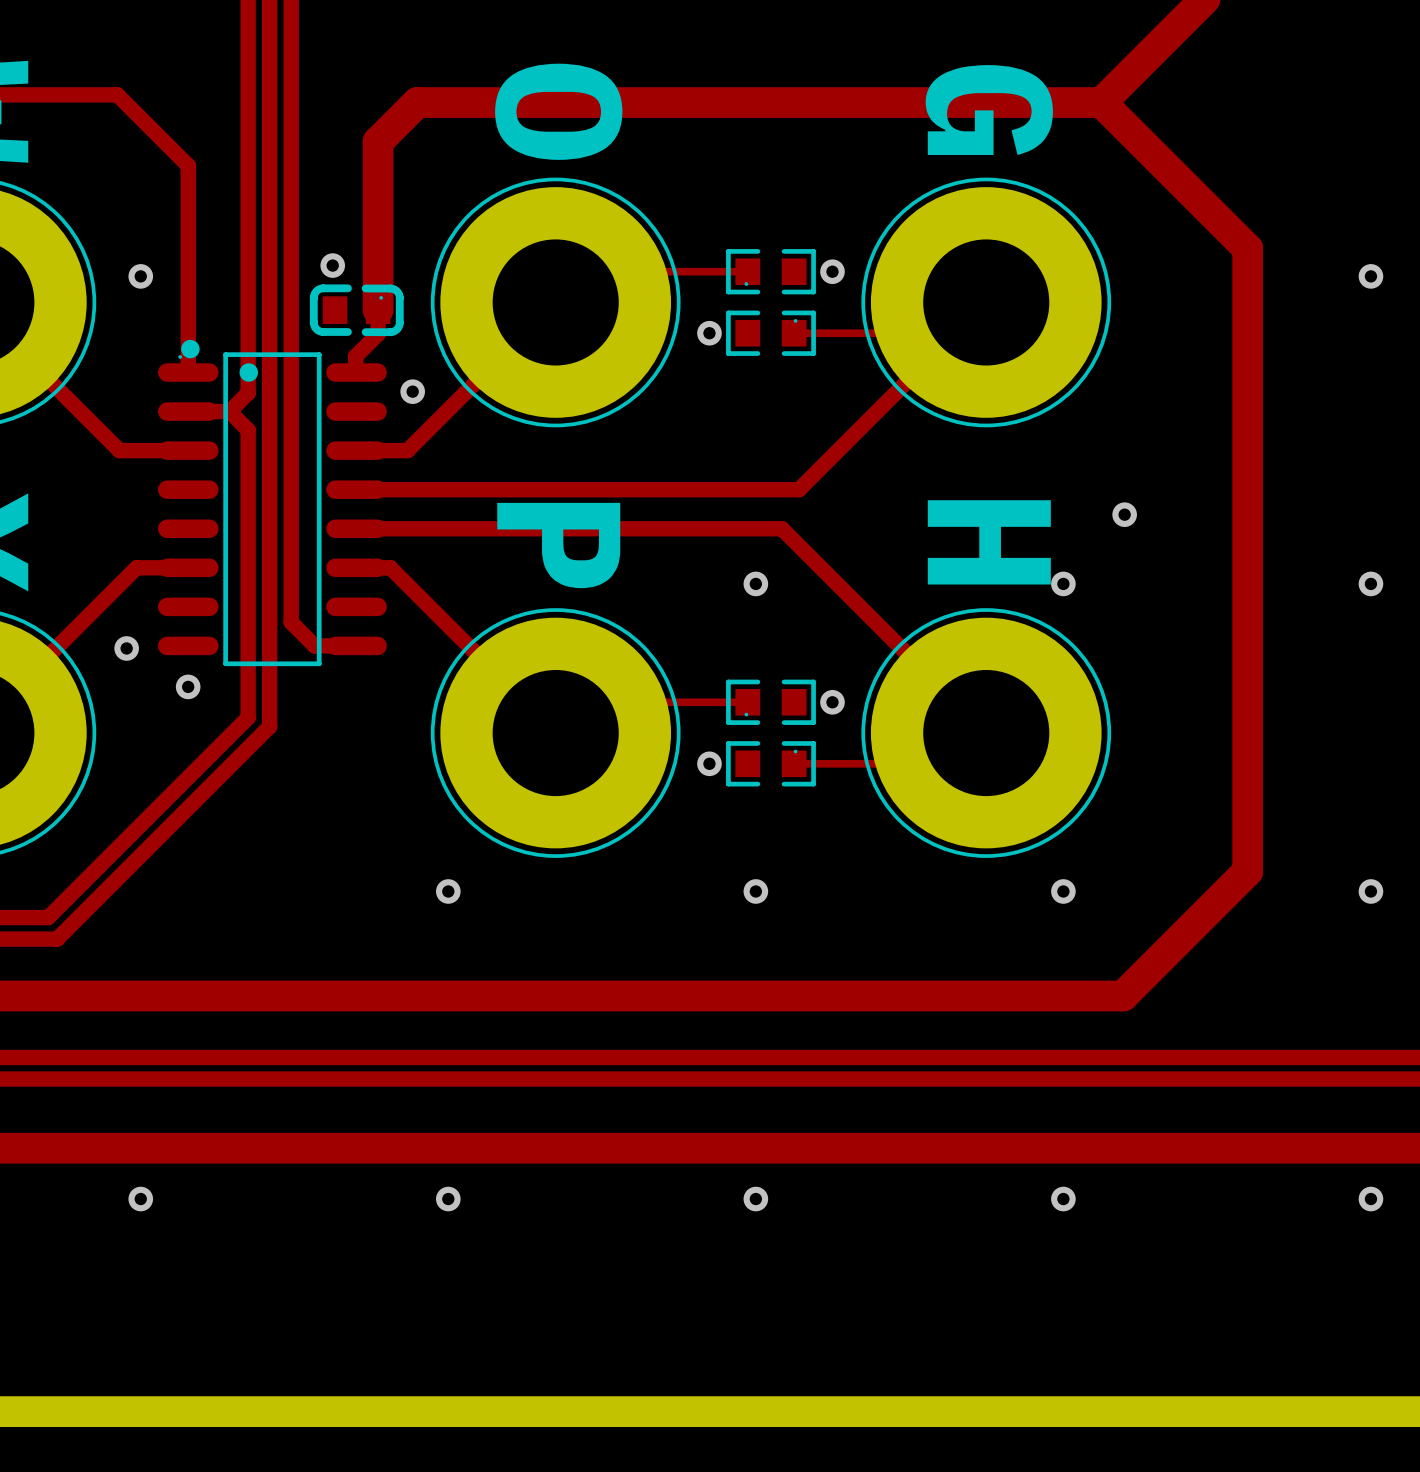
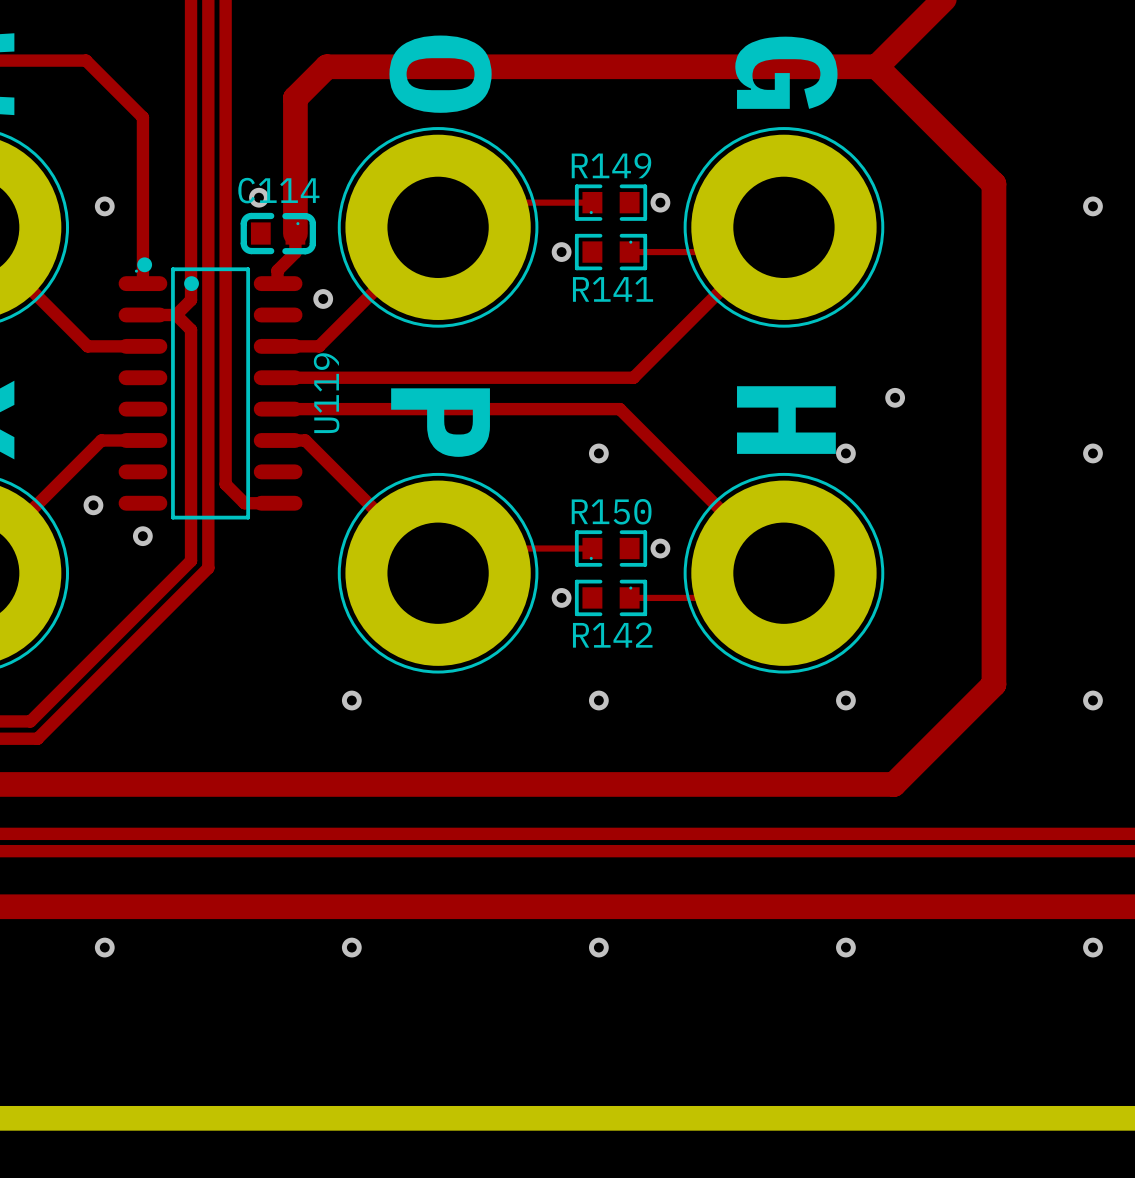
R149 name: none -> R149 (611, 165)
C114 name: none -> C114 (278, 190)
R141 name: none -> R141 (613, 289)
U119 name: none -> U119 (326, 393)
R150 name: none -> R150 (611, 511)
R142 name: none -> R142 (612, 635)

